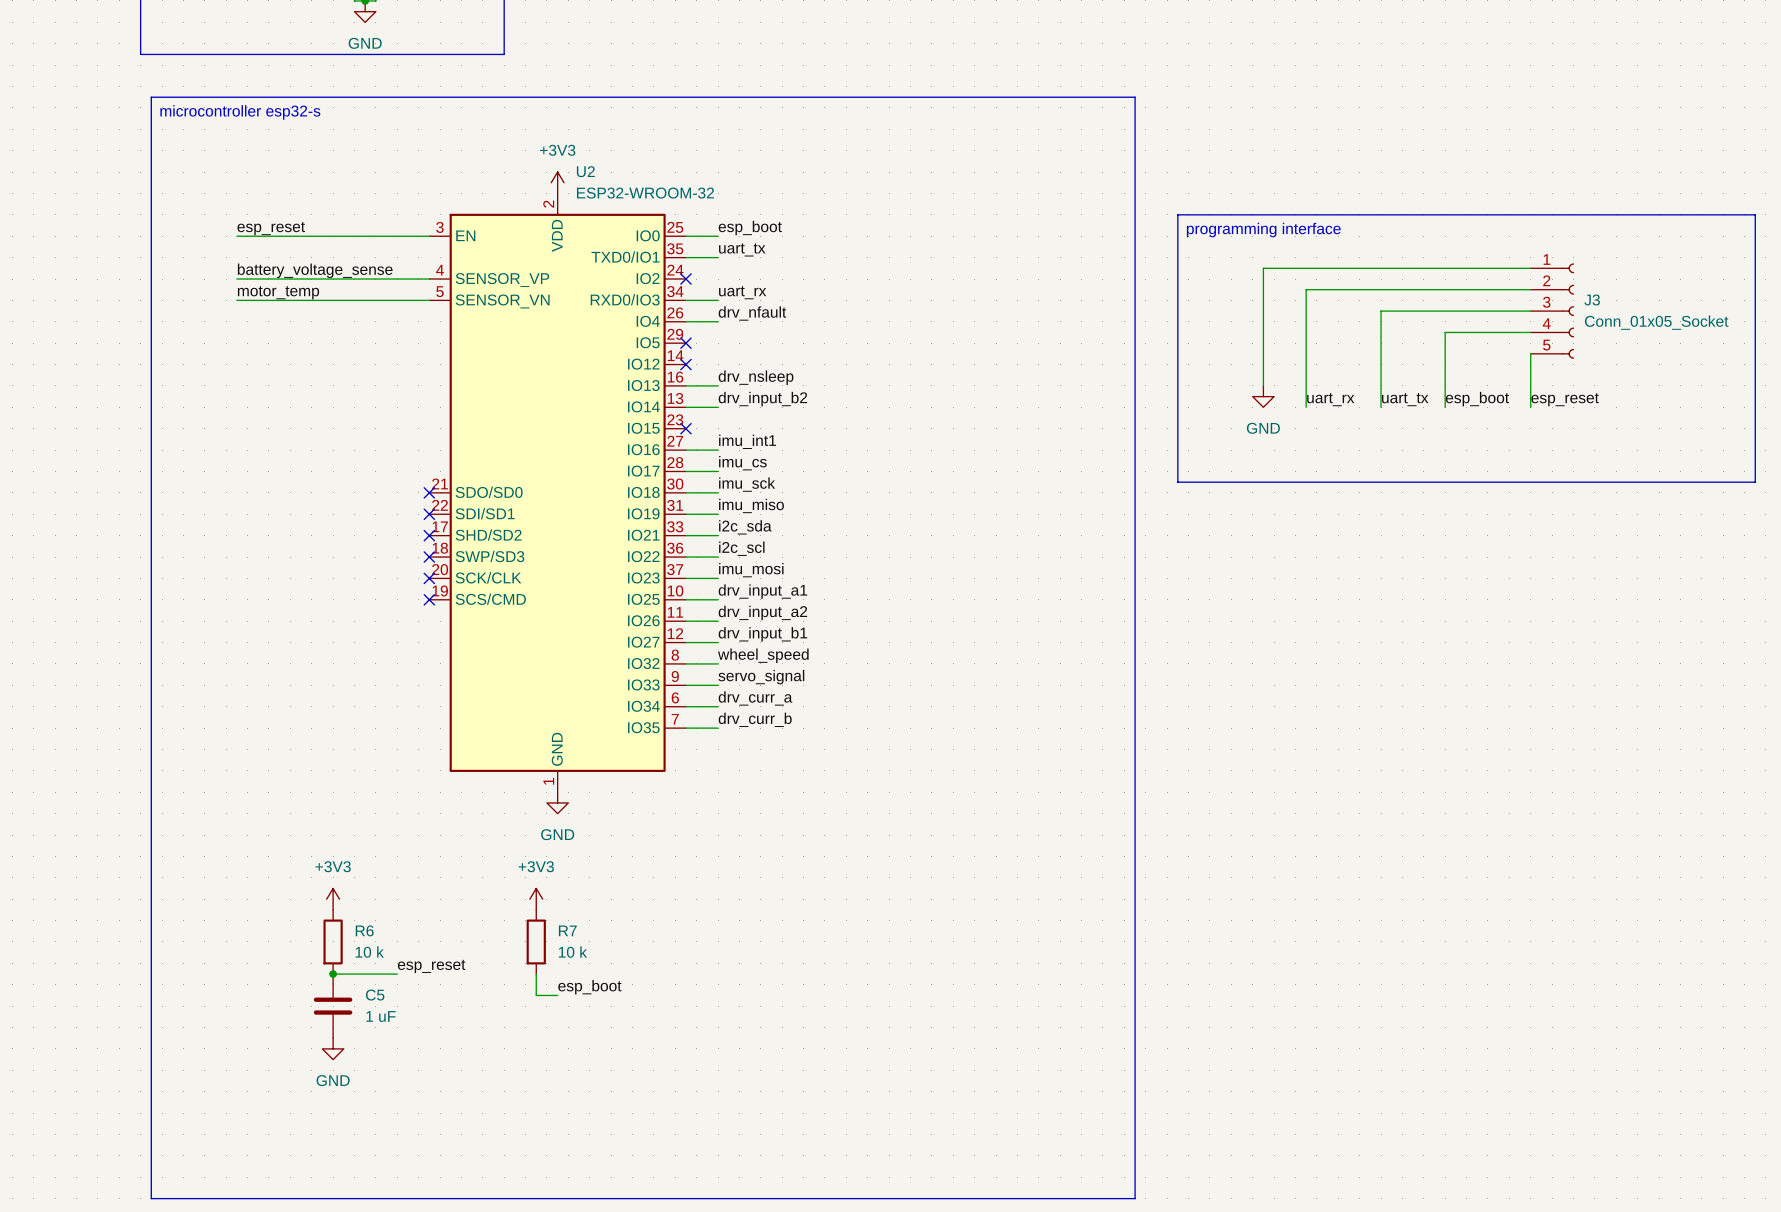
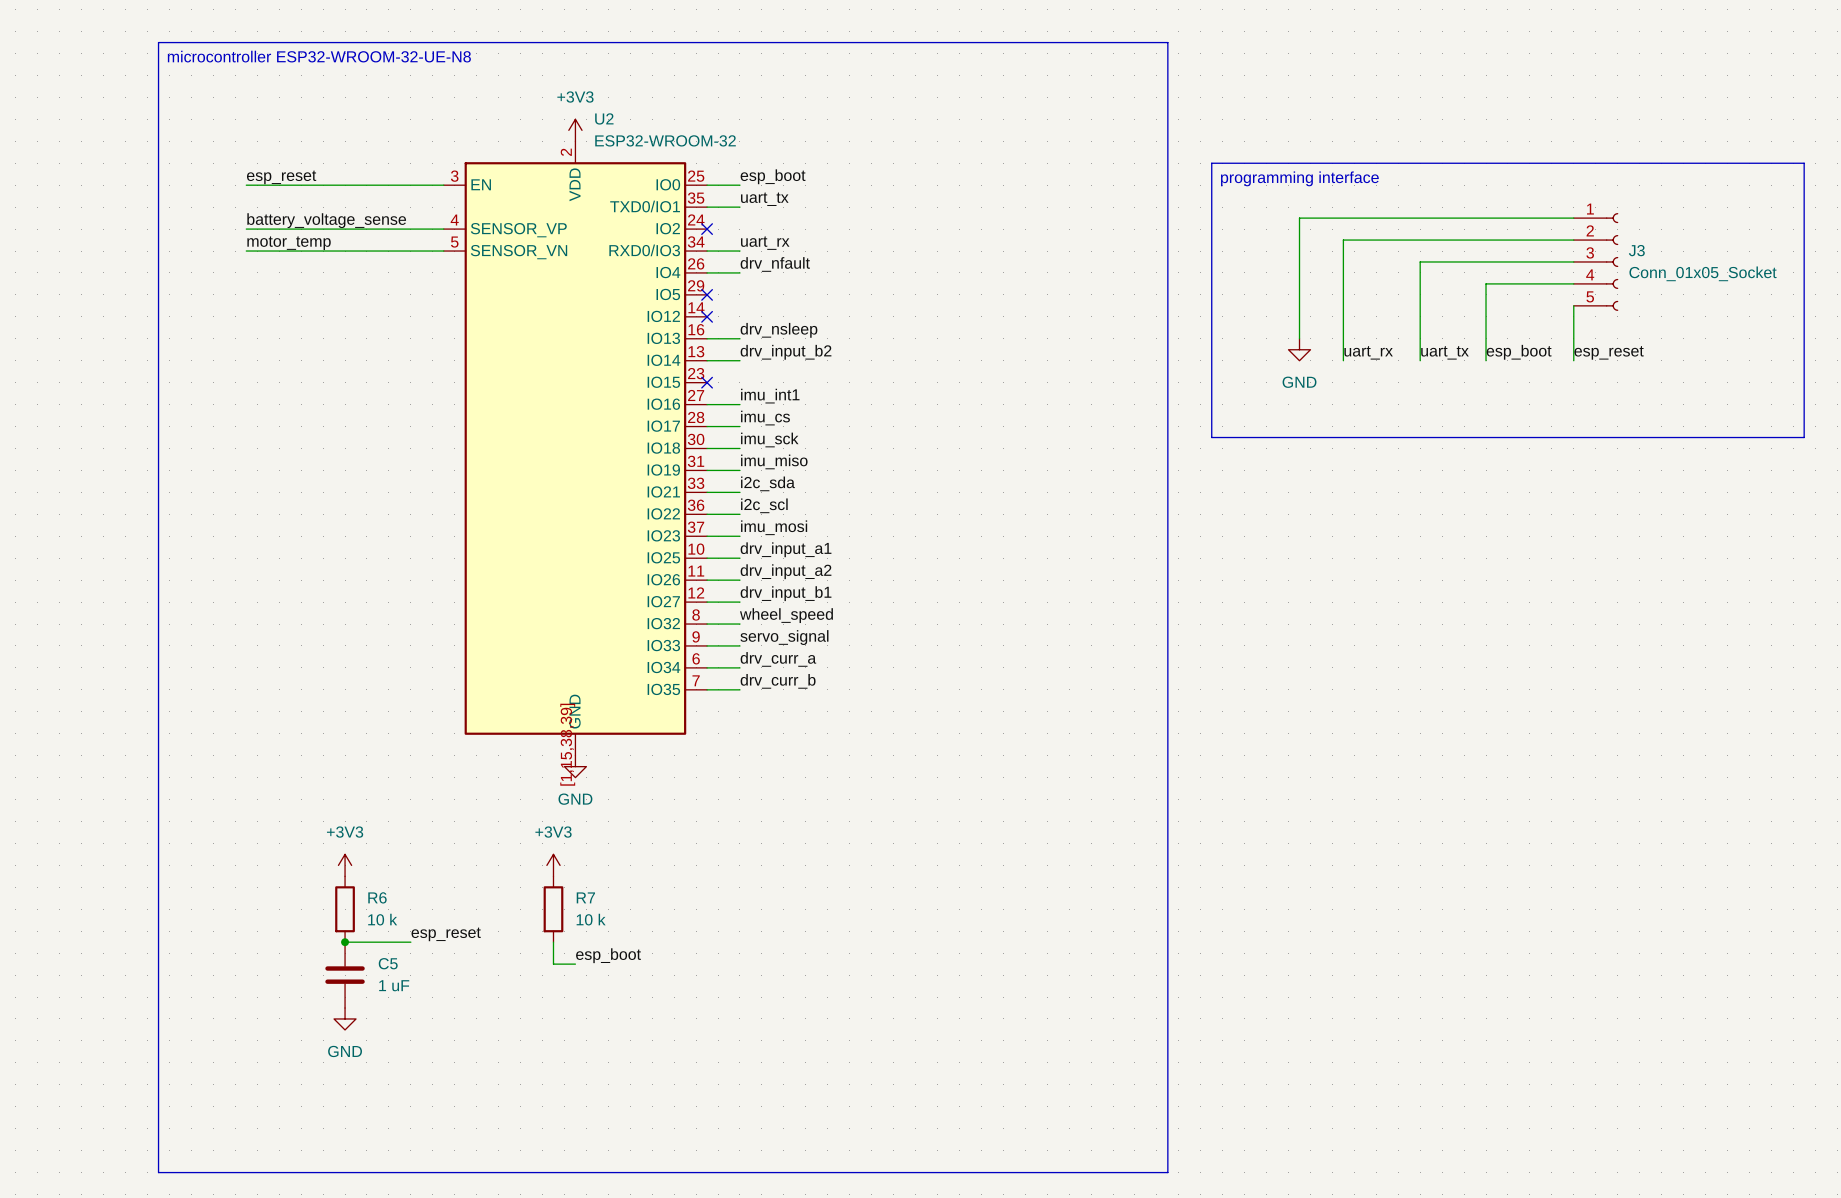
text: microcontroller esp32-s (240, 112) -> microcontroller ESP32-WROOM-32-UE-N8 (319, 56)
U2 symbol: [429, 193, 686, 793] -> [443, 141, 708, 756]
no-connect mark: (429, 492) -> none
no-connect mark: (429, 514) -> none
no-connect mark: (429, 535) -> none
no-connect mark: (429, 557) -> none
no-connect mark: (429, 578) -> none
no-connect mark: (429, 599) -> none

